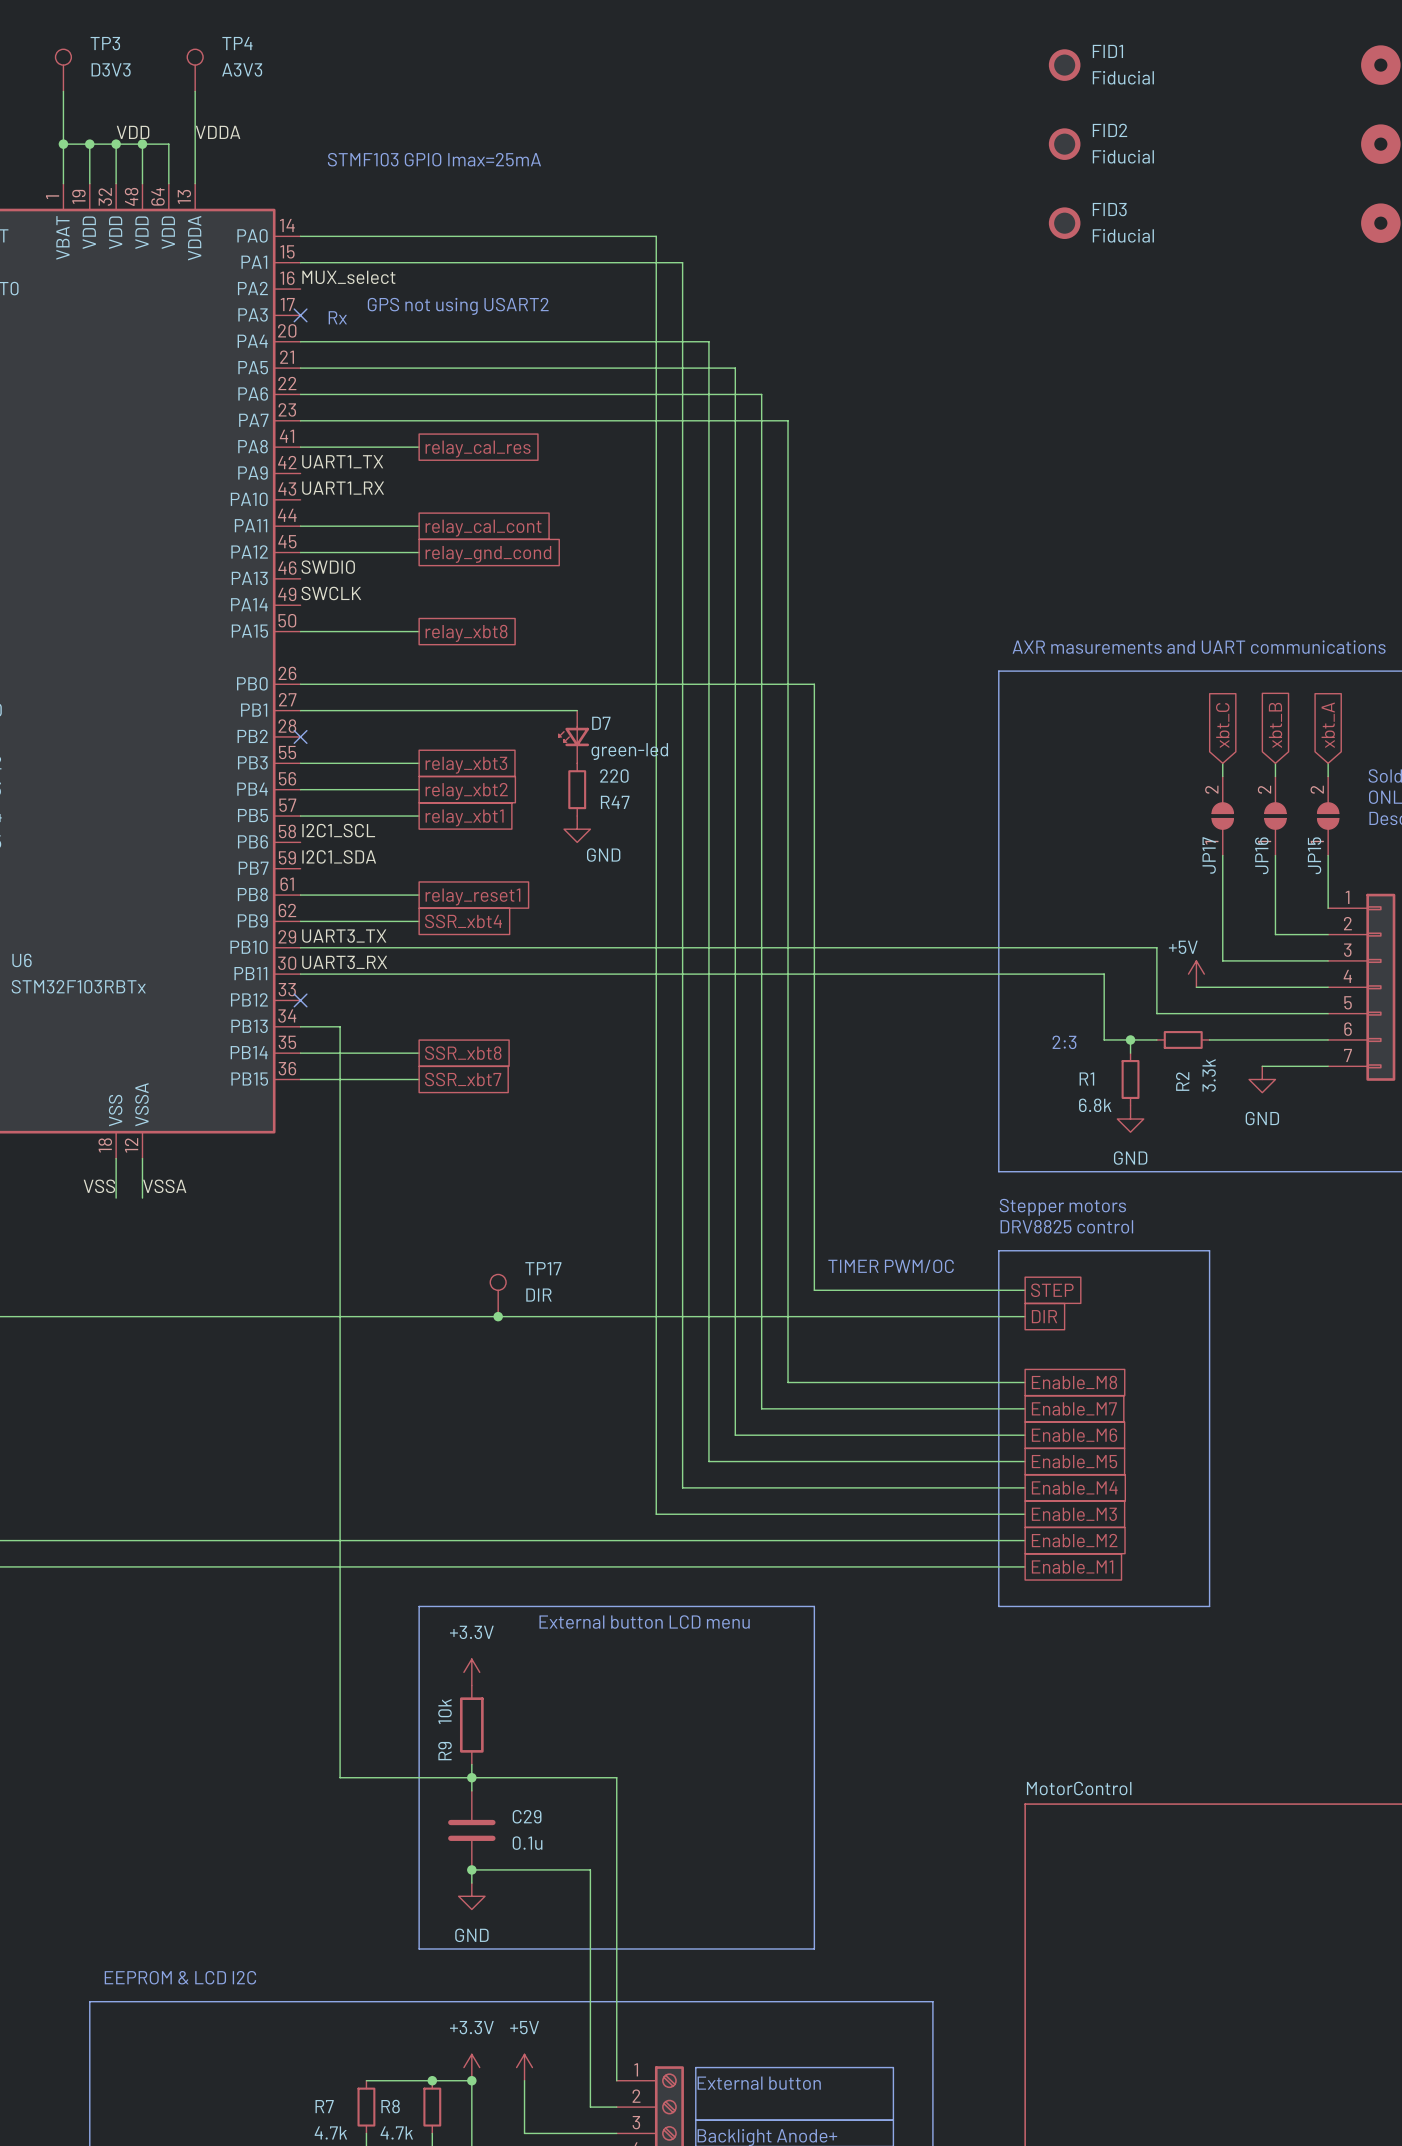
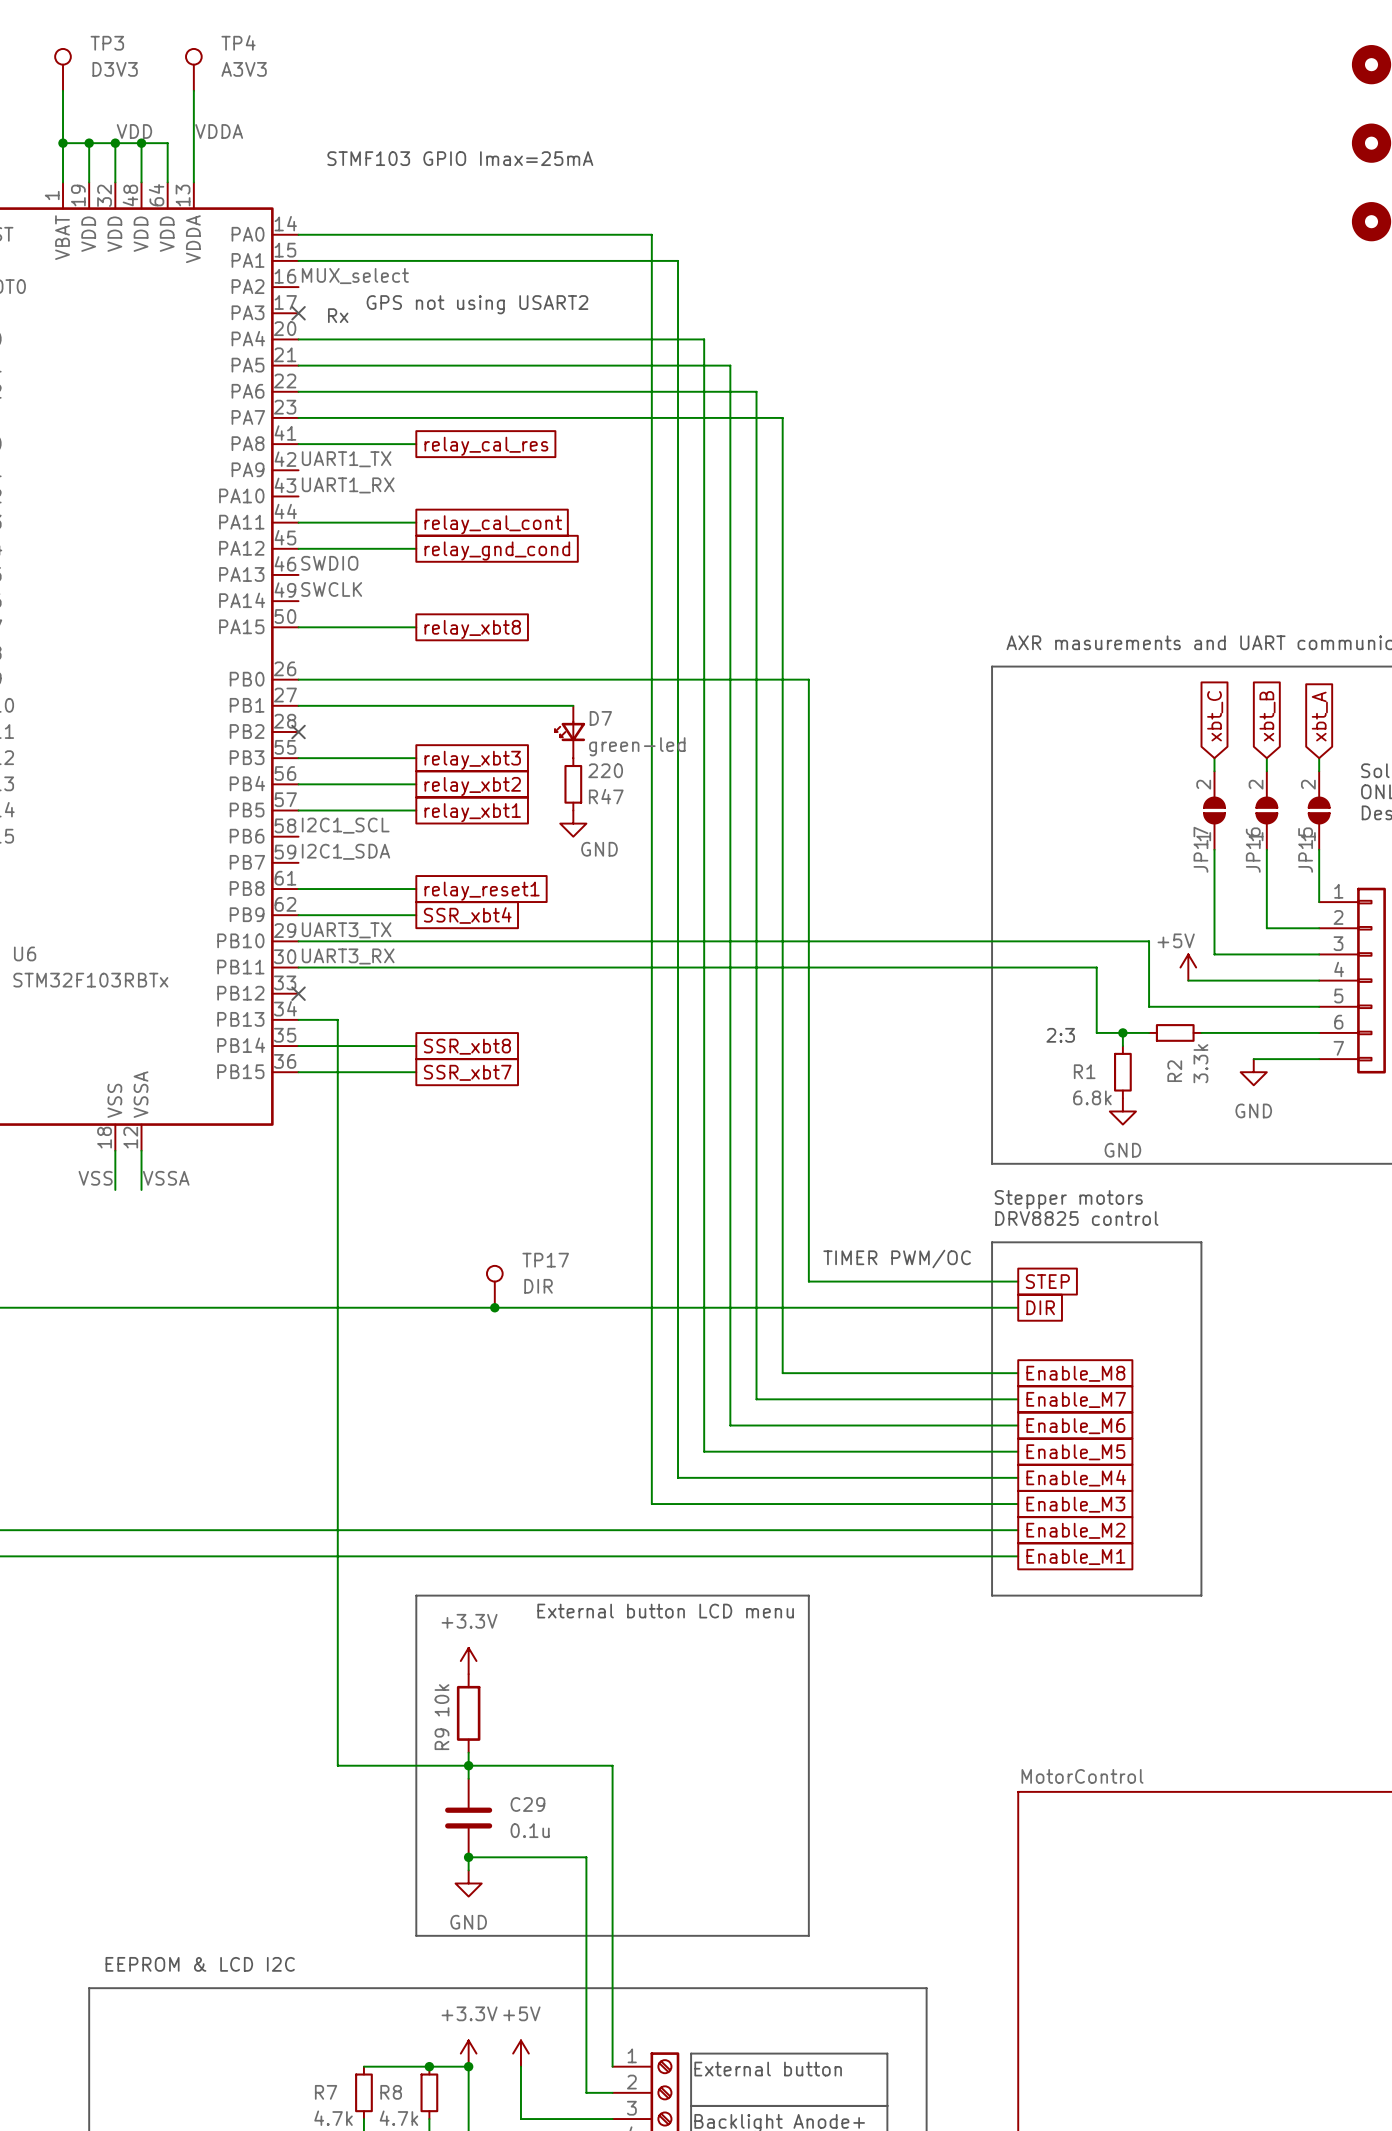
FID1: Fiducial (1064, 65) -> none
FID2: Fiducial (1064, 144) -> none
FID3: Fiducial (1064, 223) -> none

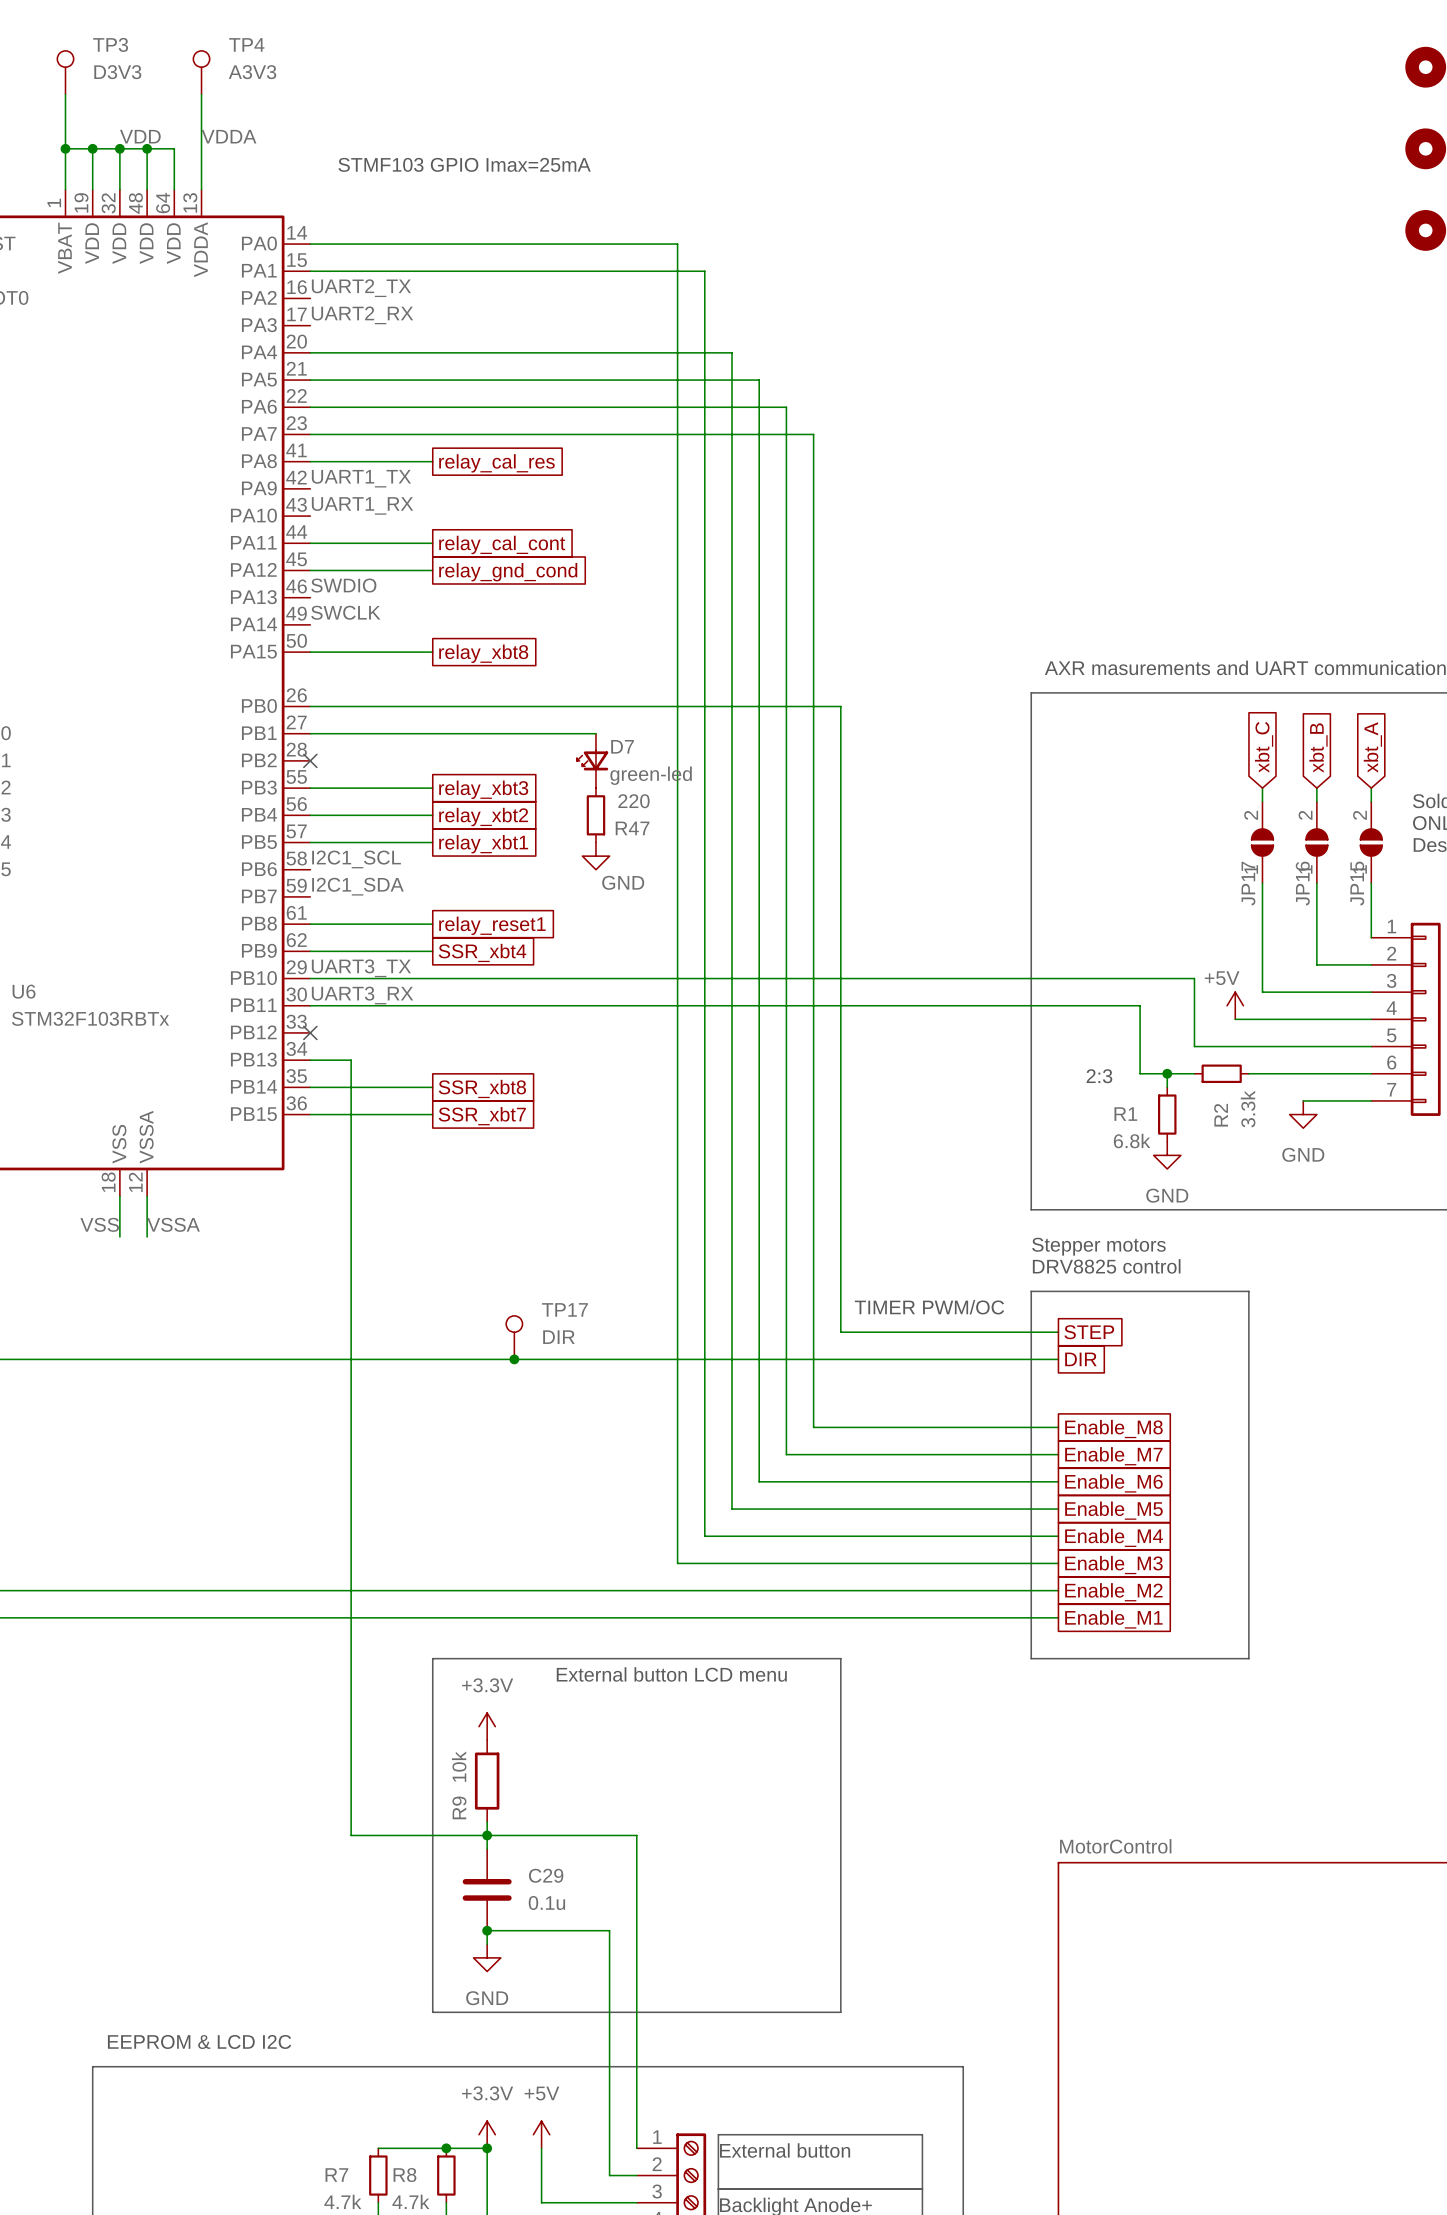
label: MUX_select (355, 276) -> UART2_TX (361, 288)
label: none -> UART2_RX (362, 315)
text: GPS not using USART2 (477, 304) -> none
no-connect mark: (298, 313) -> none
text: Rx (338, 315) -> none

